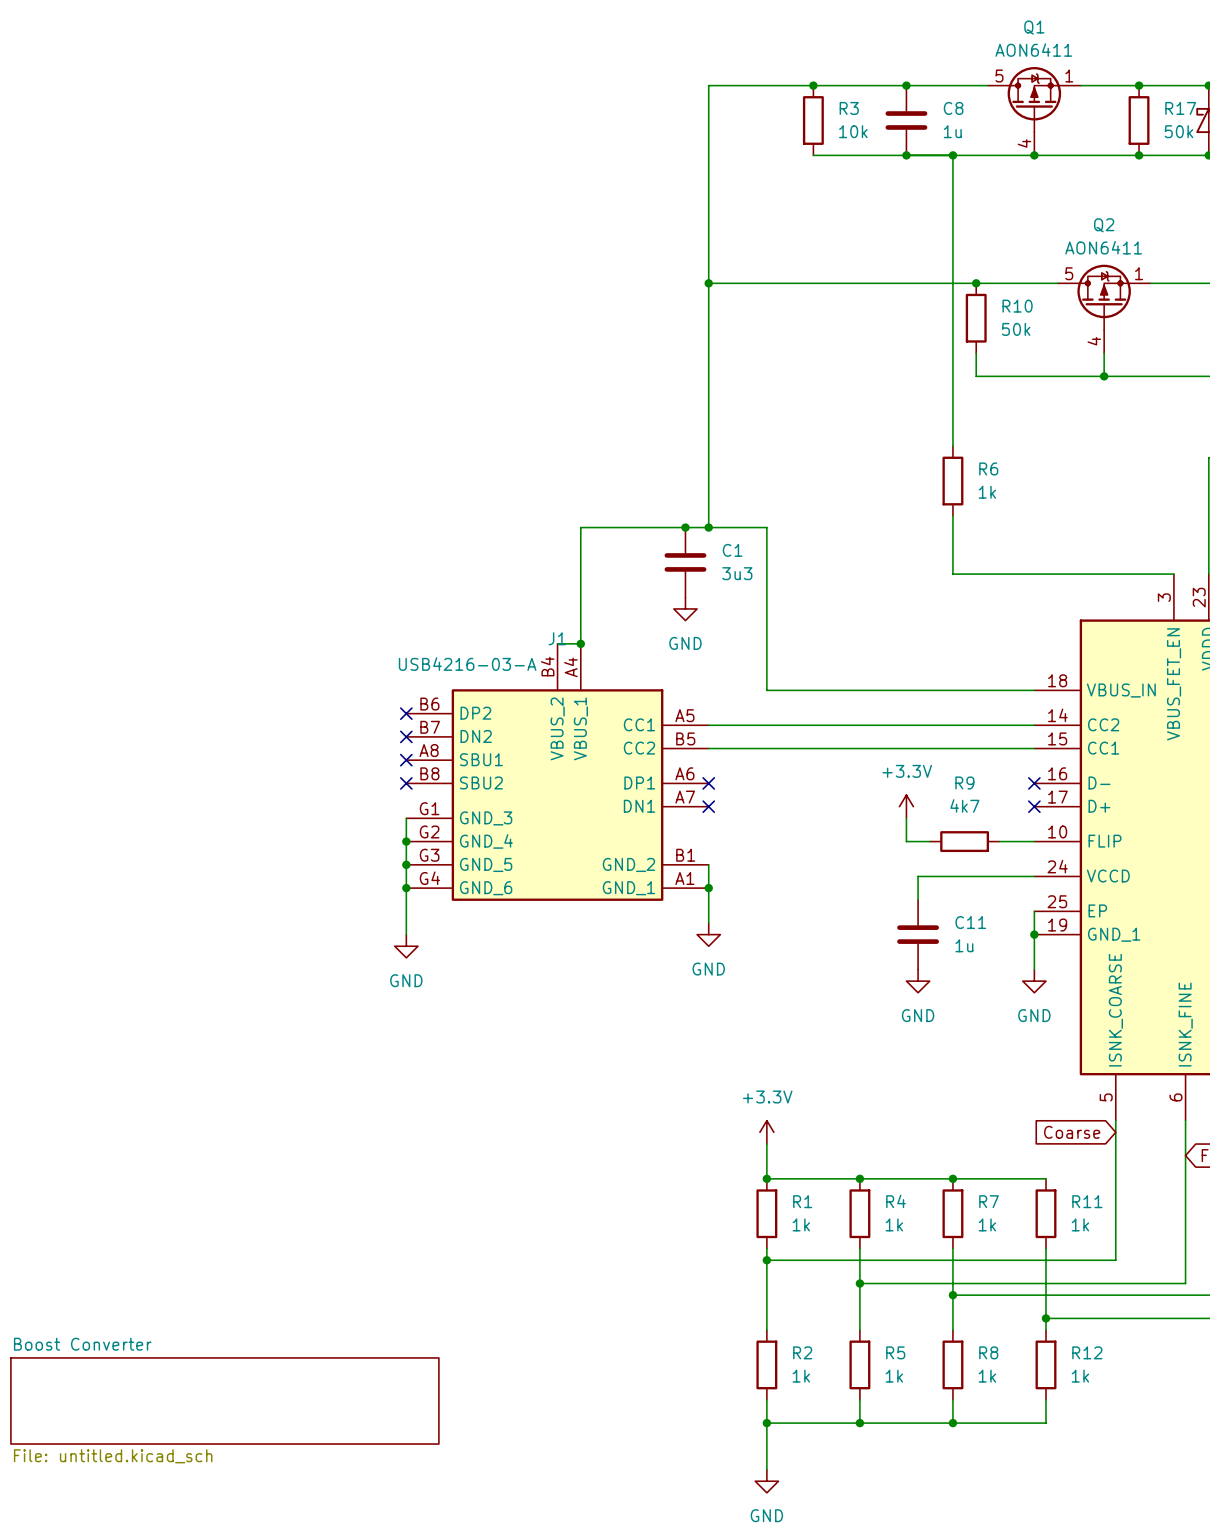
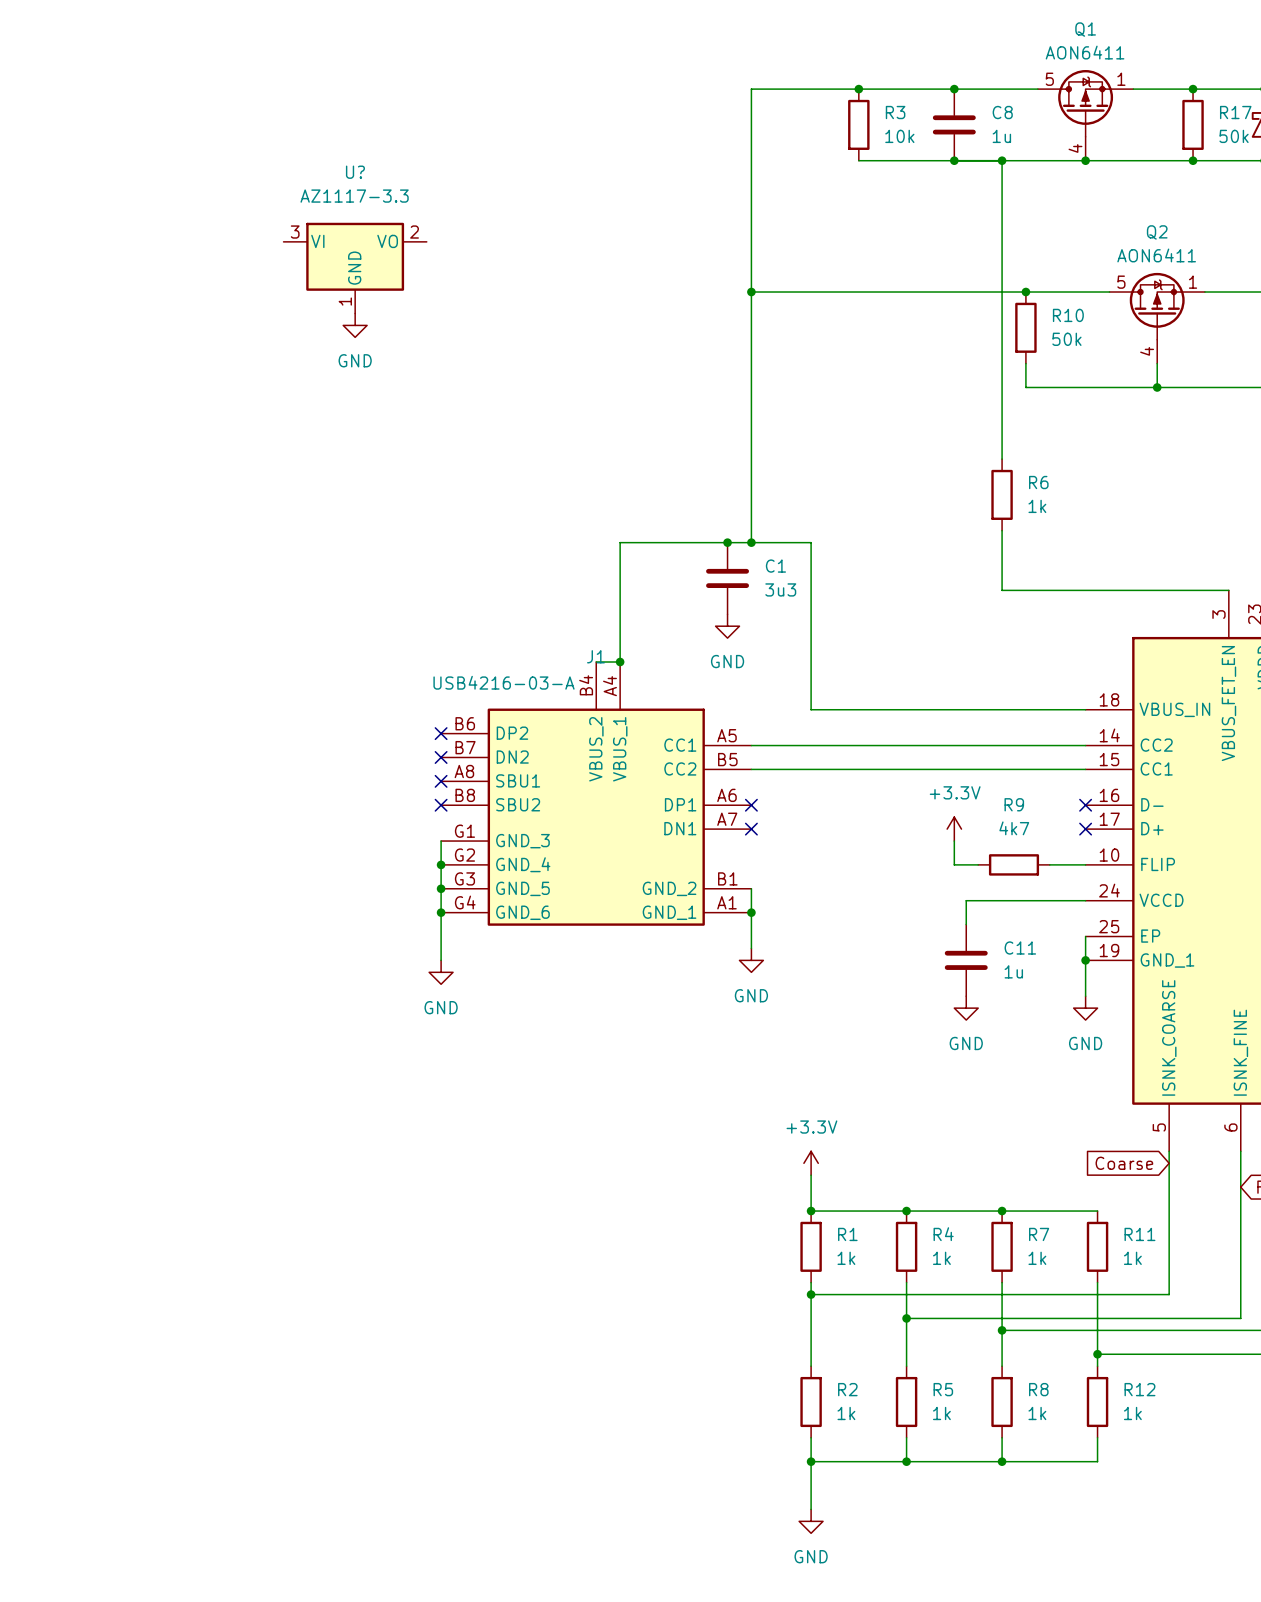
U?: none -> AZ1117-3.3 (355, 268)
power symbol: none -> GND (355, 325)
sheet Boost Converter: File: untitled.kicad_sch (224, 1400) -> none

